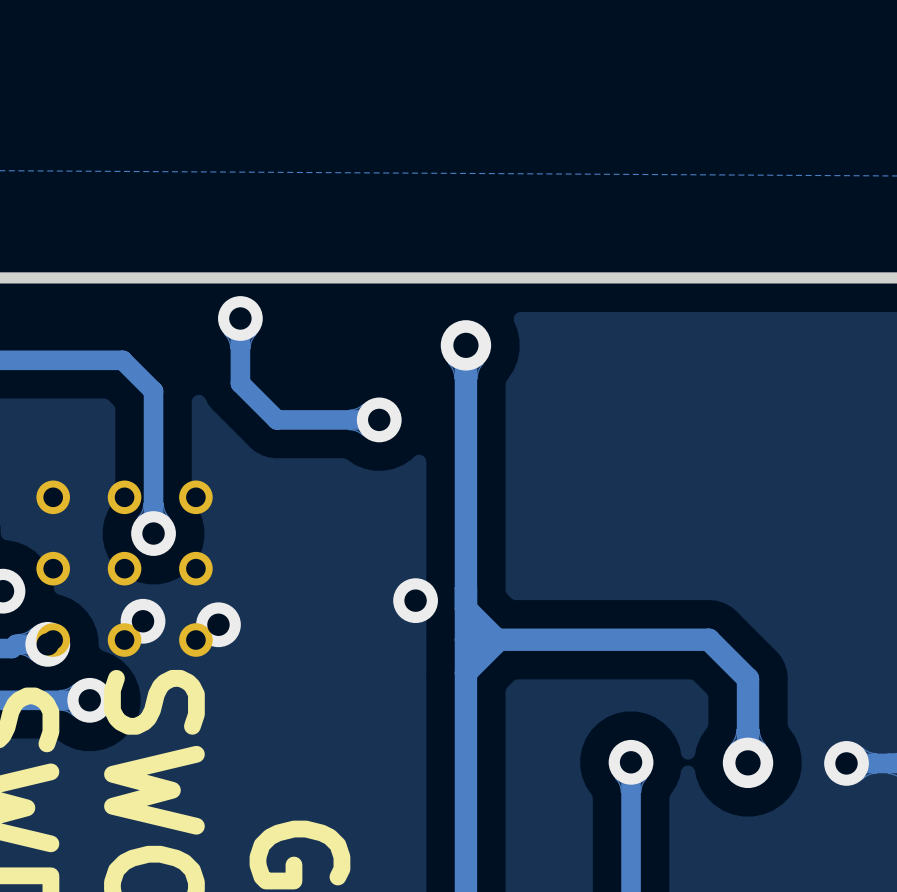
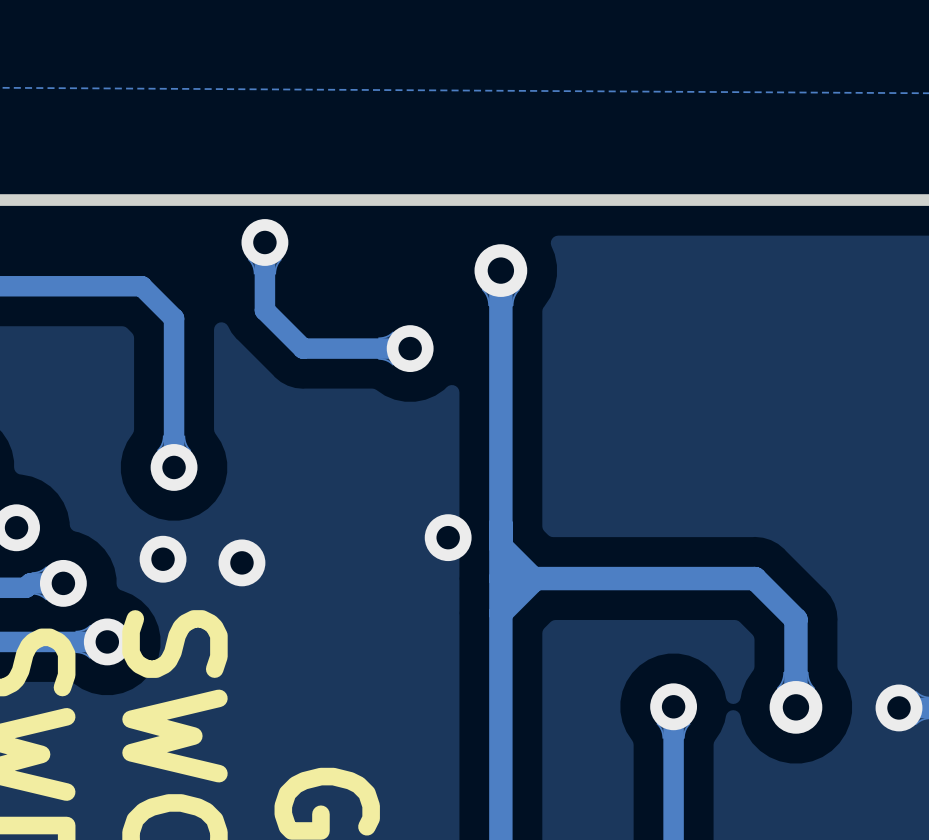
part: (124, 568) -> none

